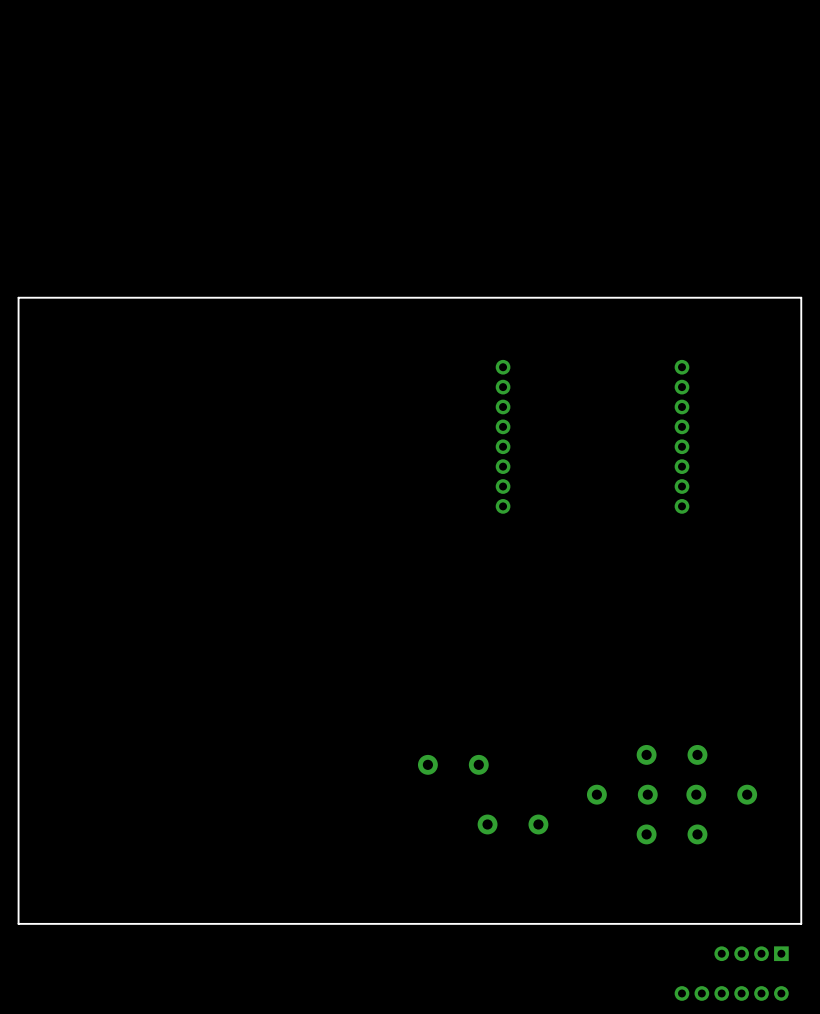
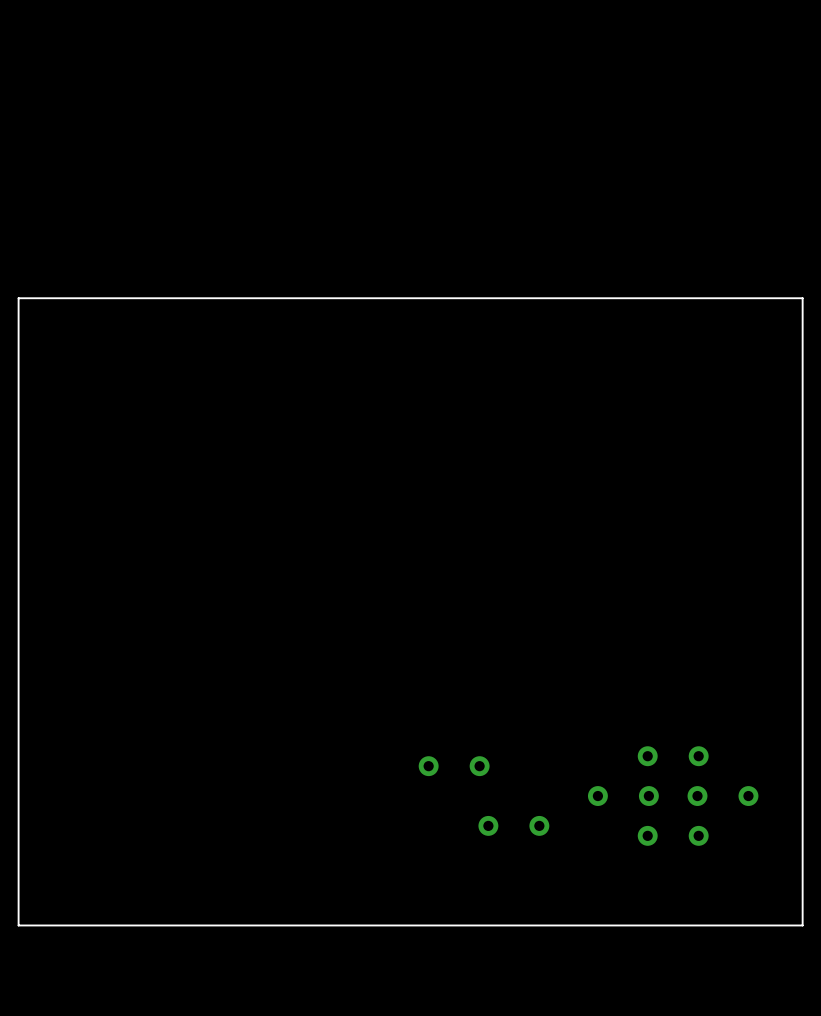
part: (503, 436) -> none
part: (681, 436) -> none
part: (751, 953) -> none
part: (731, 993) -> none

